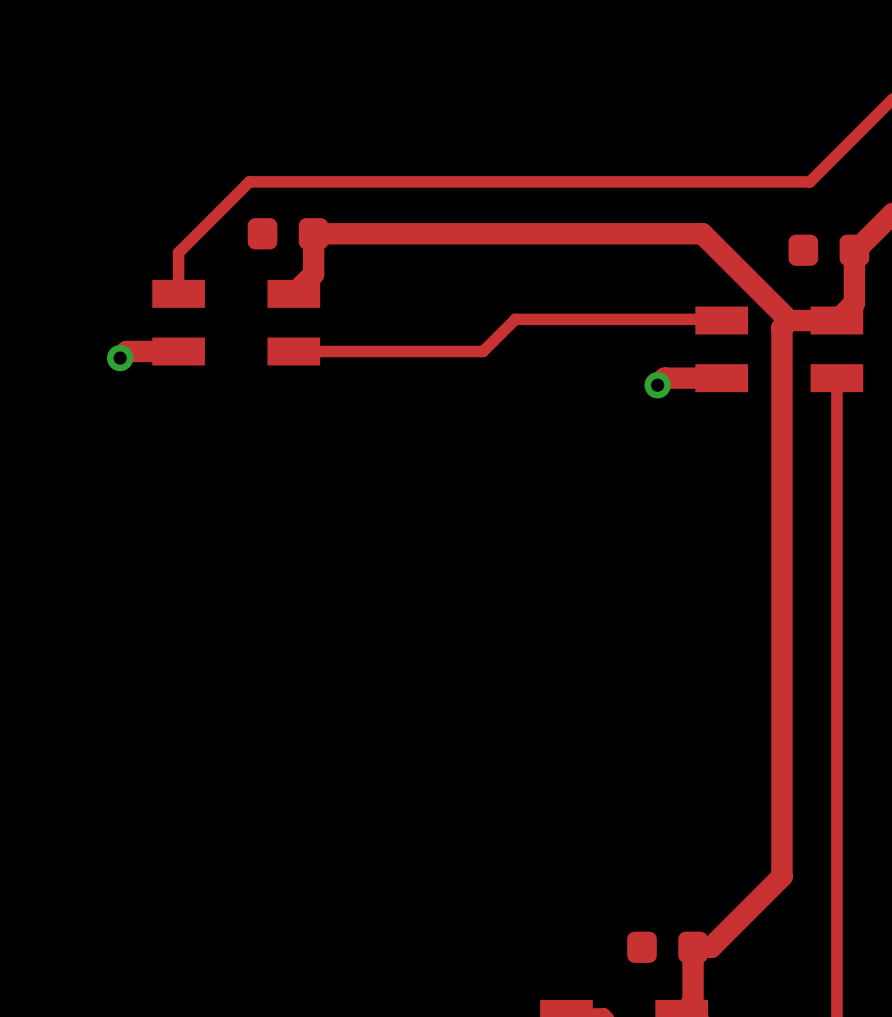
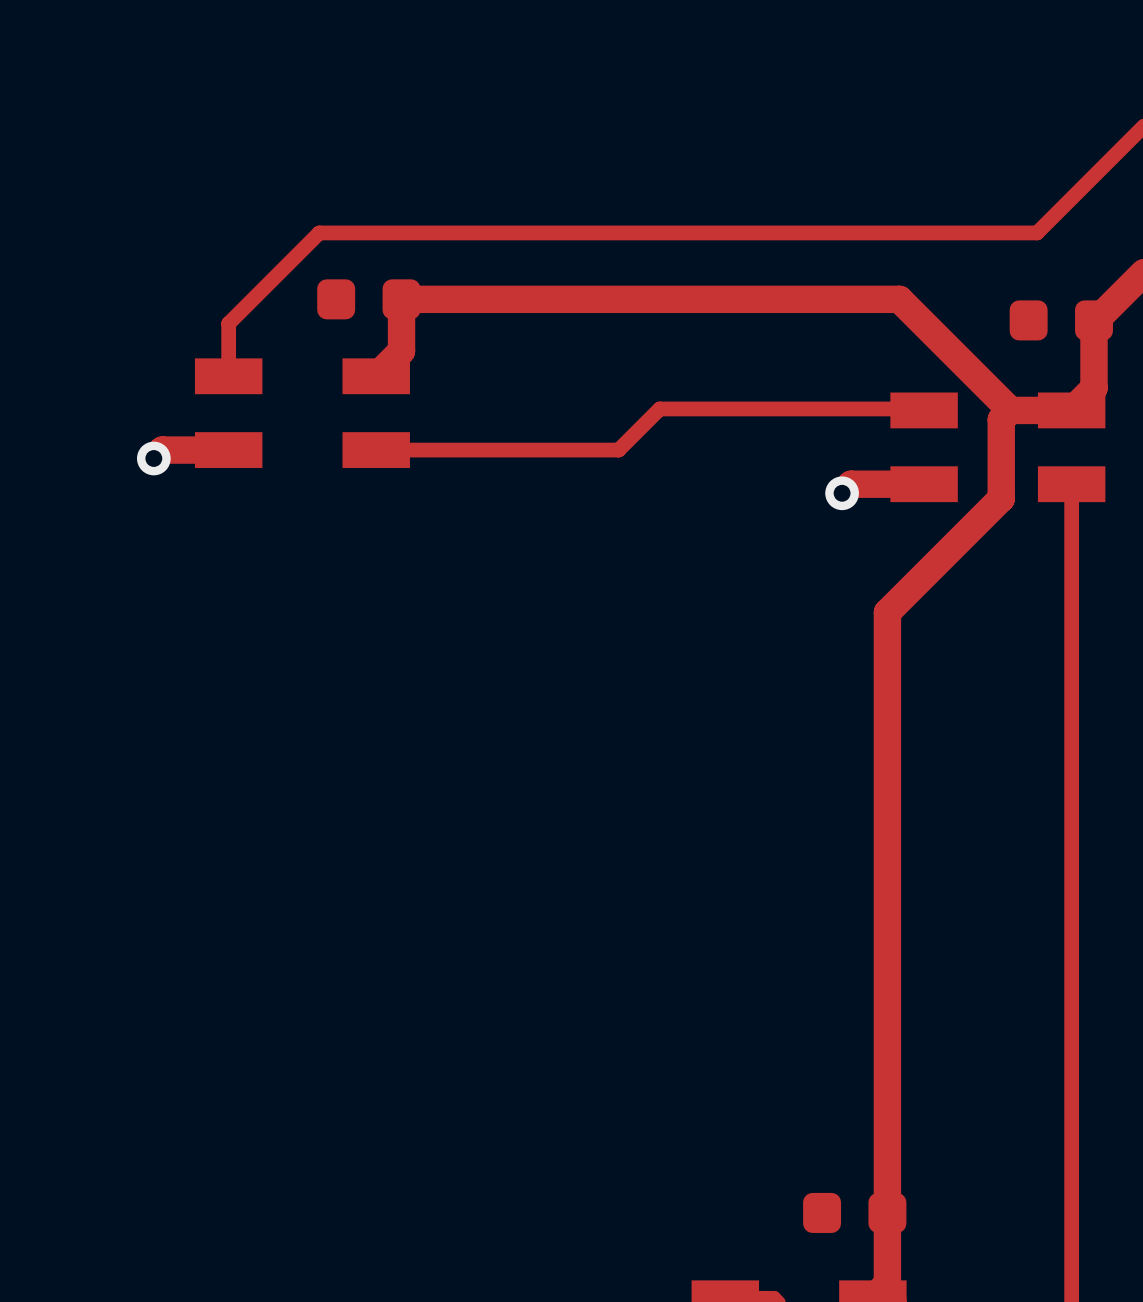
top track: (781, 389) (781, 876) (711, 947) (693, 947) -> (1001, 498) (887, 612) (887, 1212)

